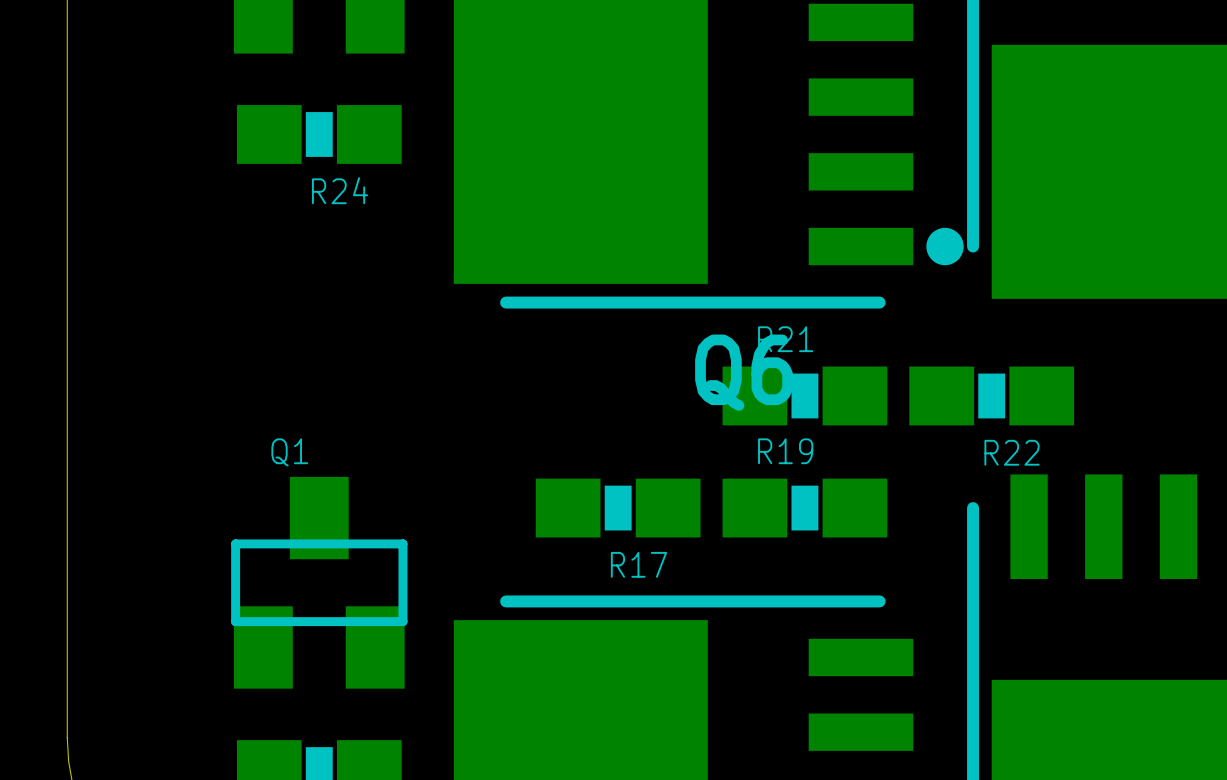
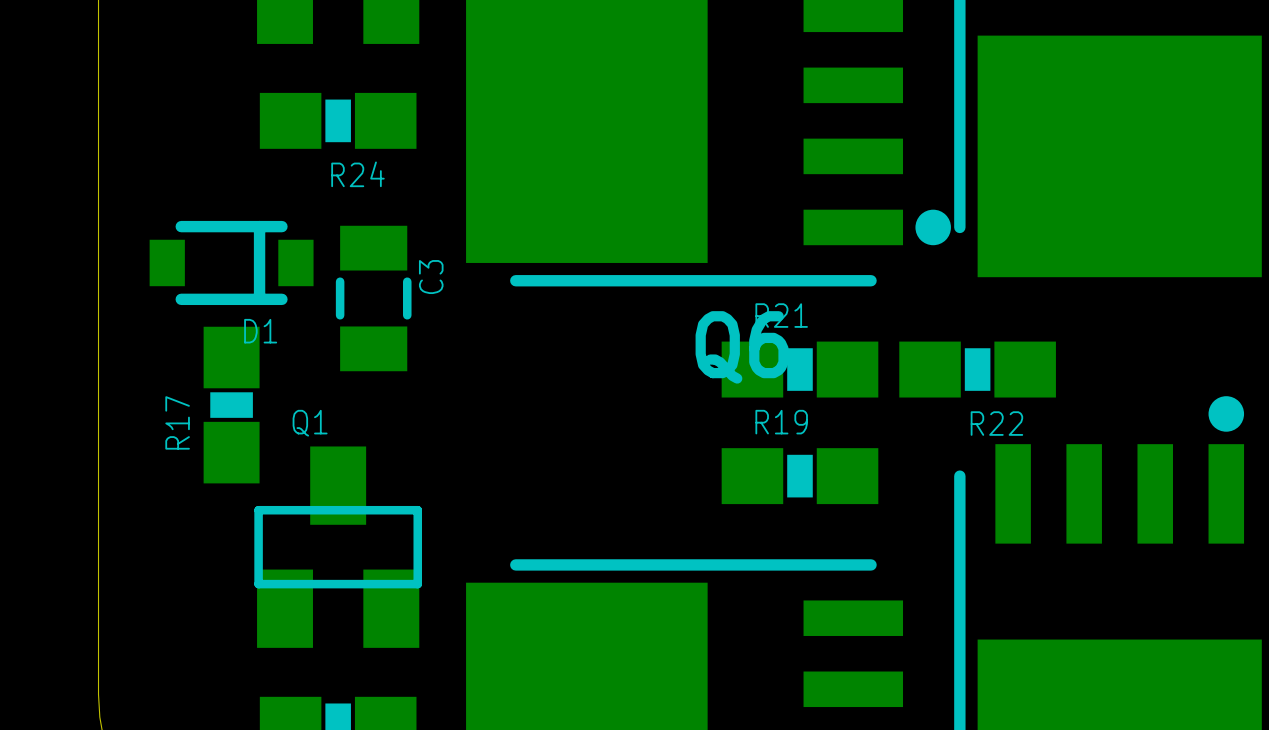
D1: none -> (231, 262)
C3: none -> (373, 298)
R17 rotation: 0° (618, 508) -> 90° clockwise (231, 405)
R17 position: (618, 508) -> (231, 405)

